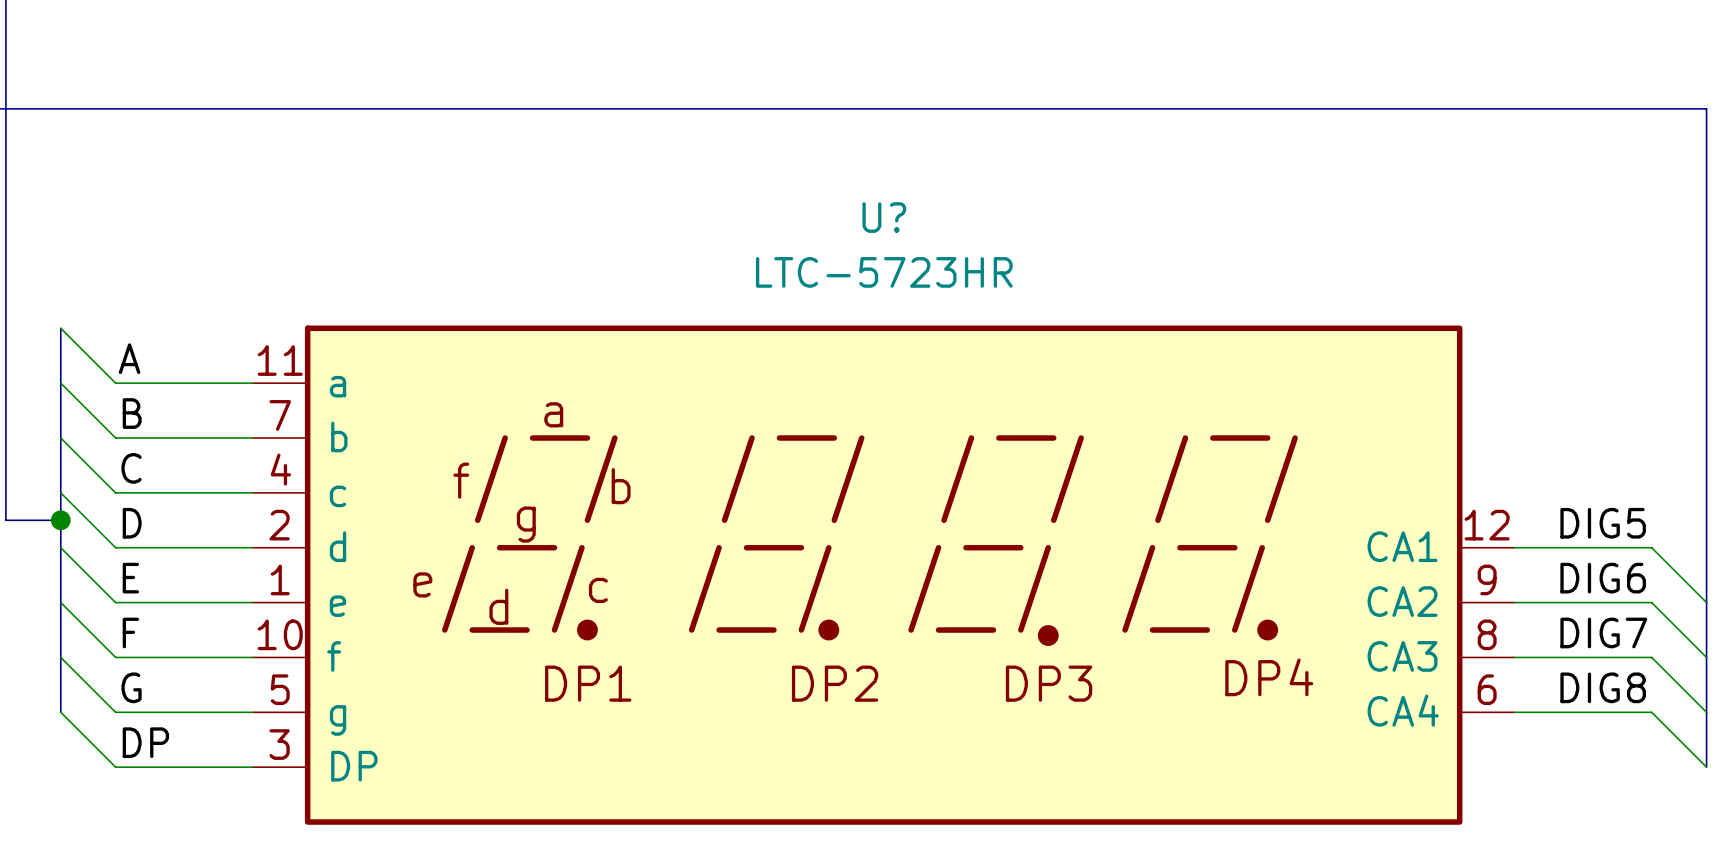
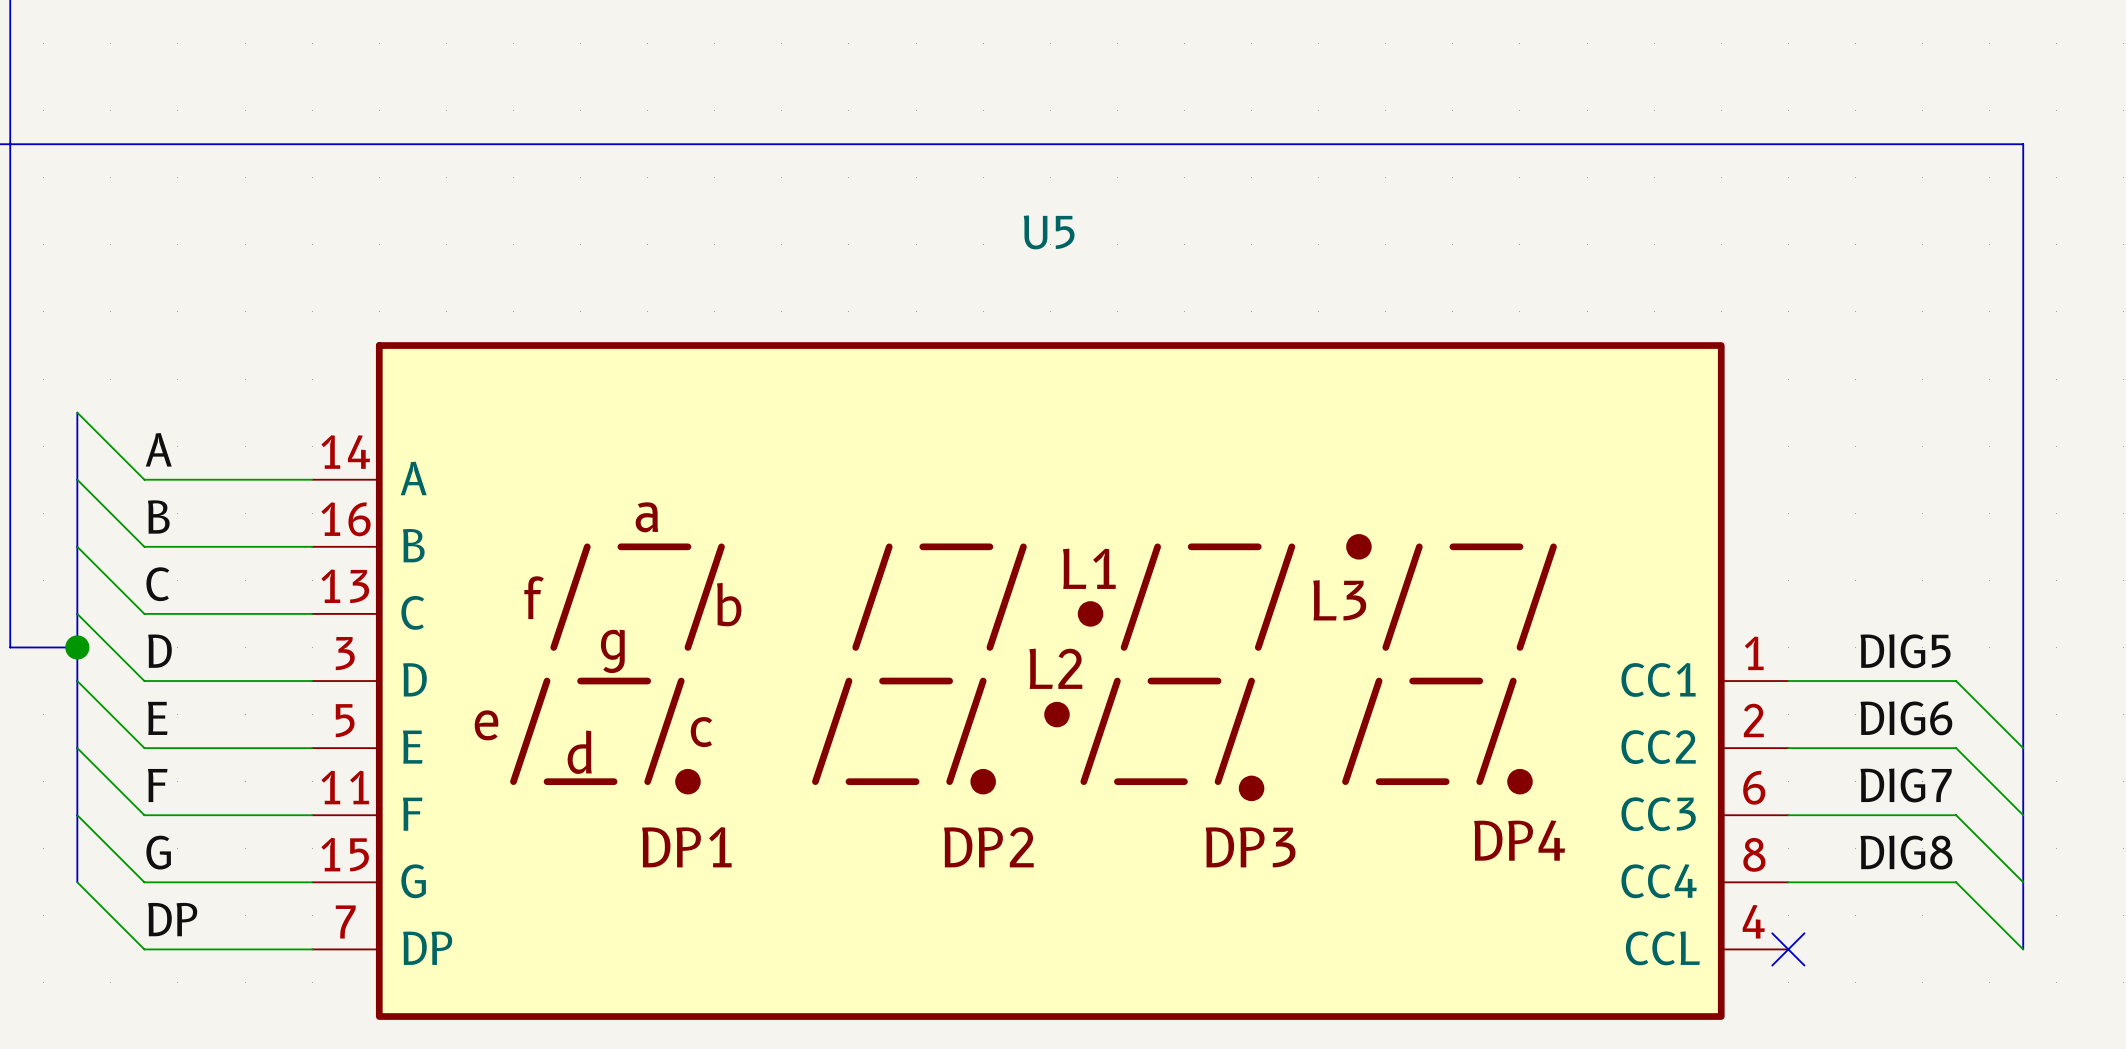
bus: (1651, 108) (1706, 108) (1706, 767) -> (2023, 144) (2023, 949)
label position: DIG5 (1603, 523) -> DIG5 (1905, 651)
U5: none -> (1050, 681)
wire: (1596, 547) (1651, 547) (1706, 602) -> (1956, 681) (2023, 748)
U?: LTC-5723HR (883, 575) -> none
label position: DIG6 (1603, 578) -> DIG6 (1906, 718)
wire: (1596, 602) (1651, 602) (1706, 657) -> (1956, 748) (2023, 815)
label position: DIG7 (1603, 632) -> DIG7 (1906, 785)
wire: (1596, 657) (1651, 657) (1706, 712) -> (1956, 815) (2023, 882)
label position: DIG8 (1603, 687) -> DIG8 (1906, 852)
wire: (1596, 712) (1651, 712) (1706, 767) -> (1956, 882) (2023, 949)
no-connect mark: none -> (1788, 949)

